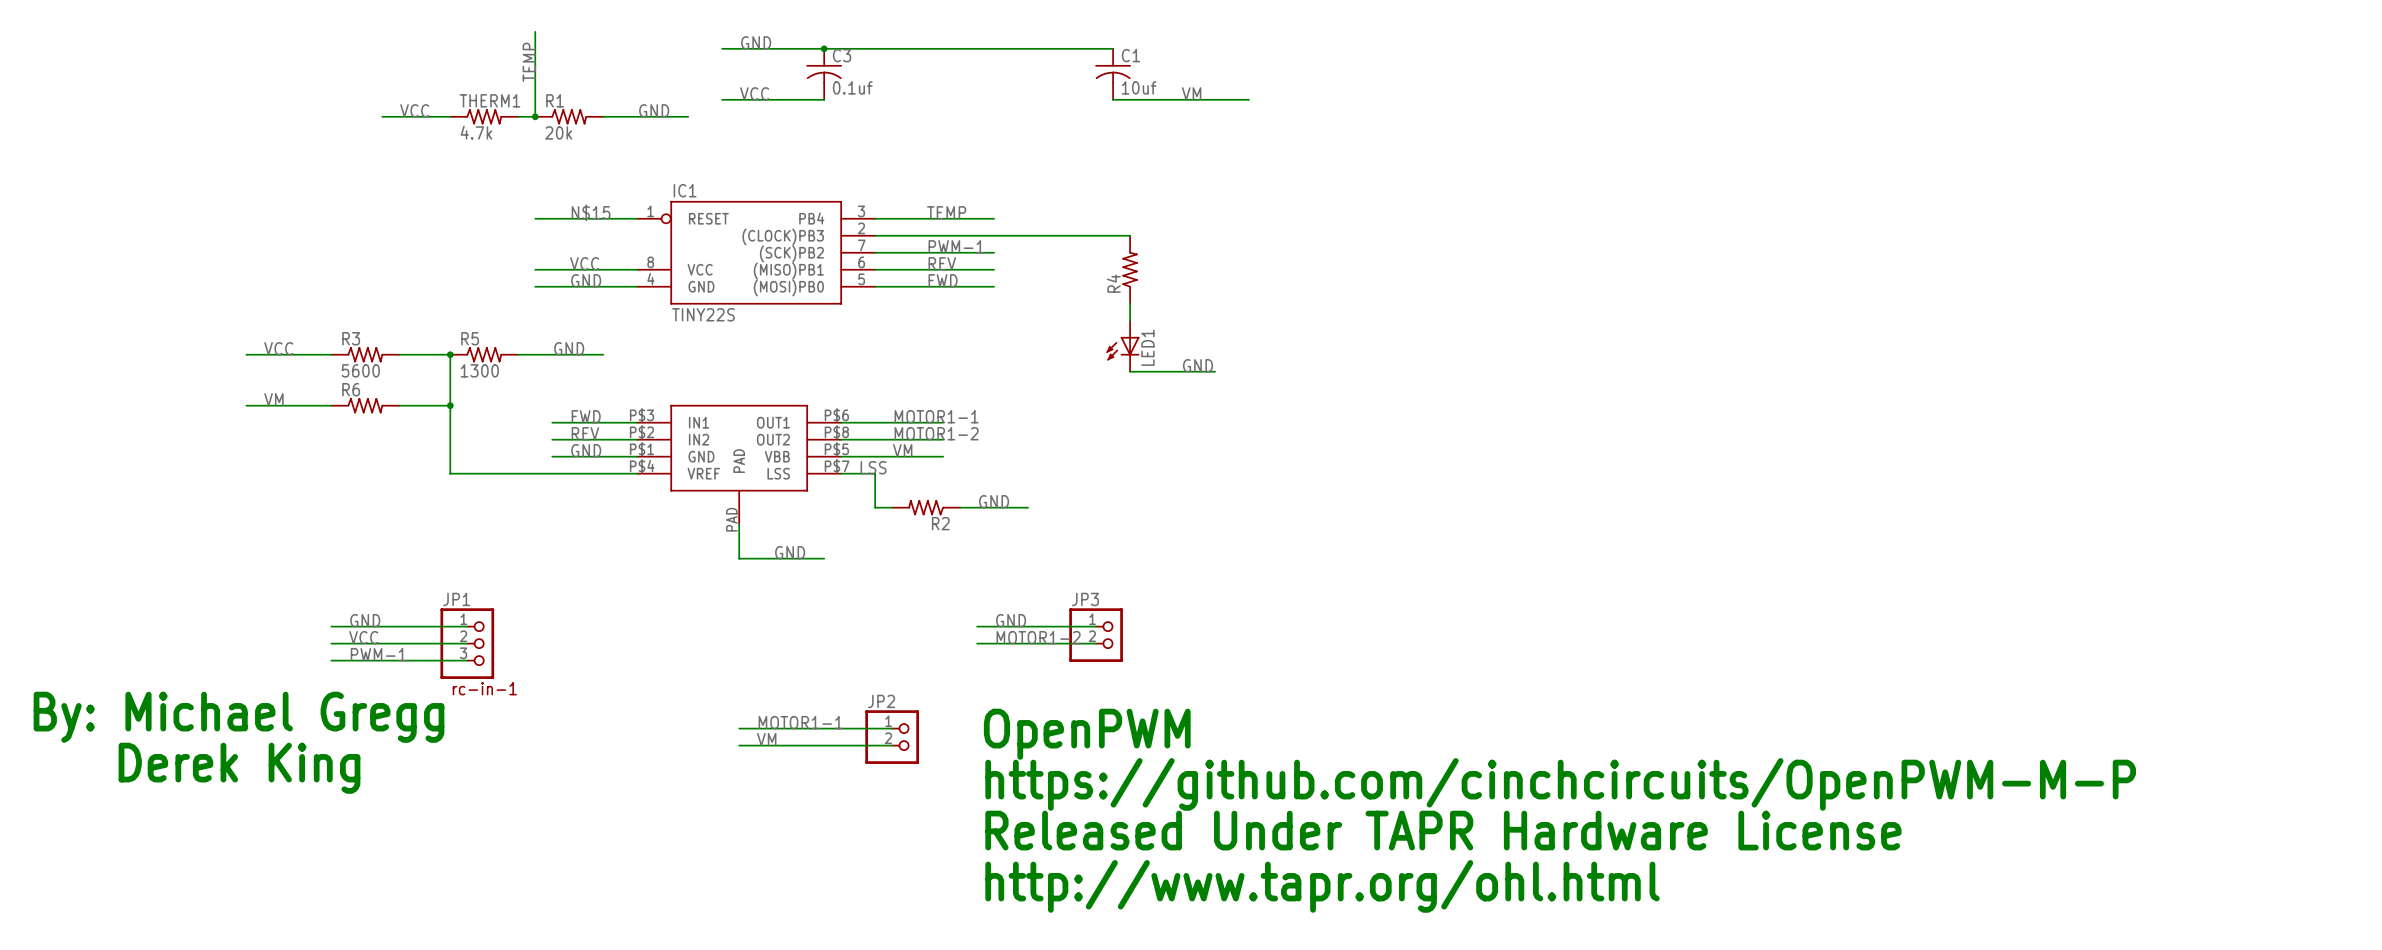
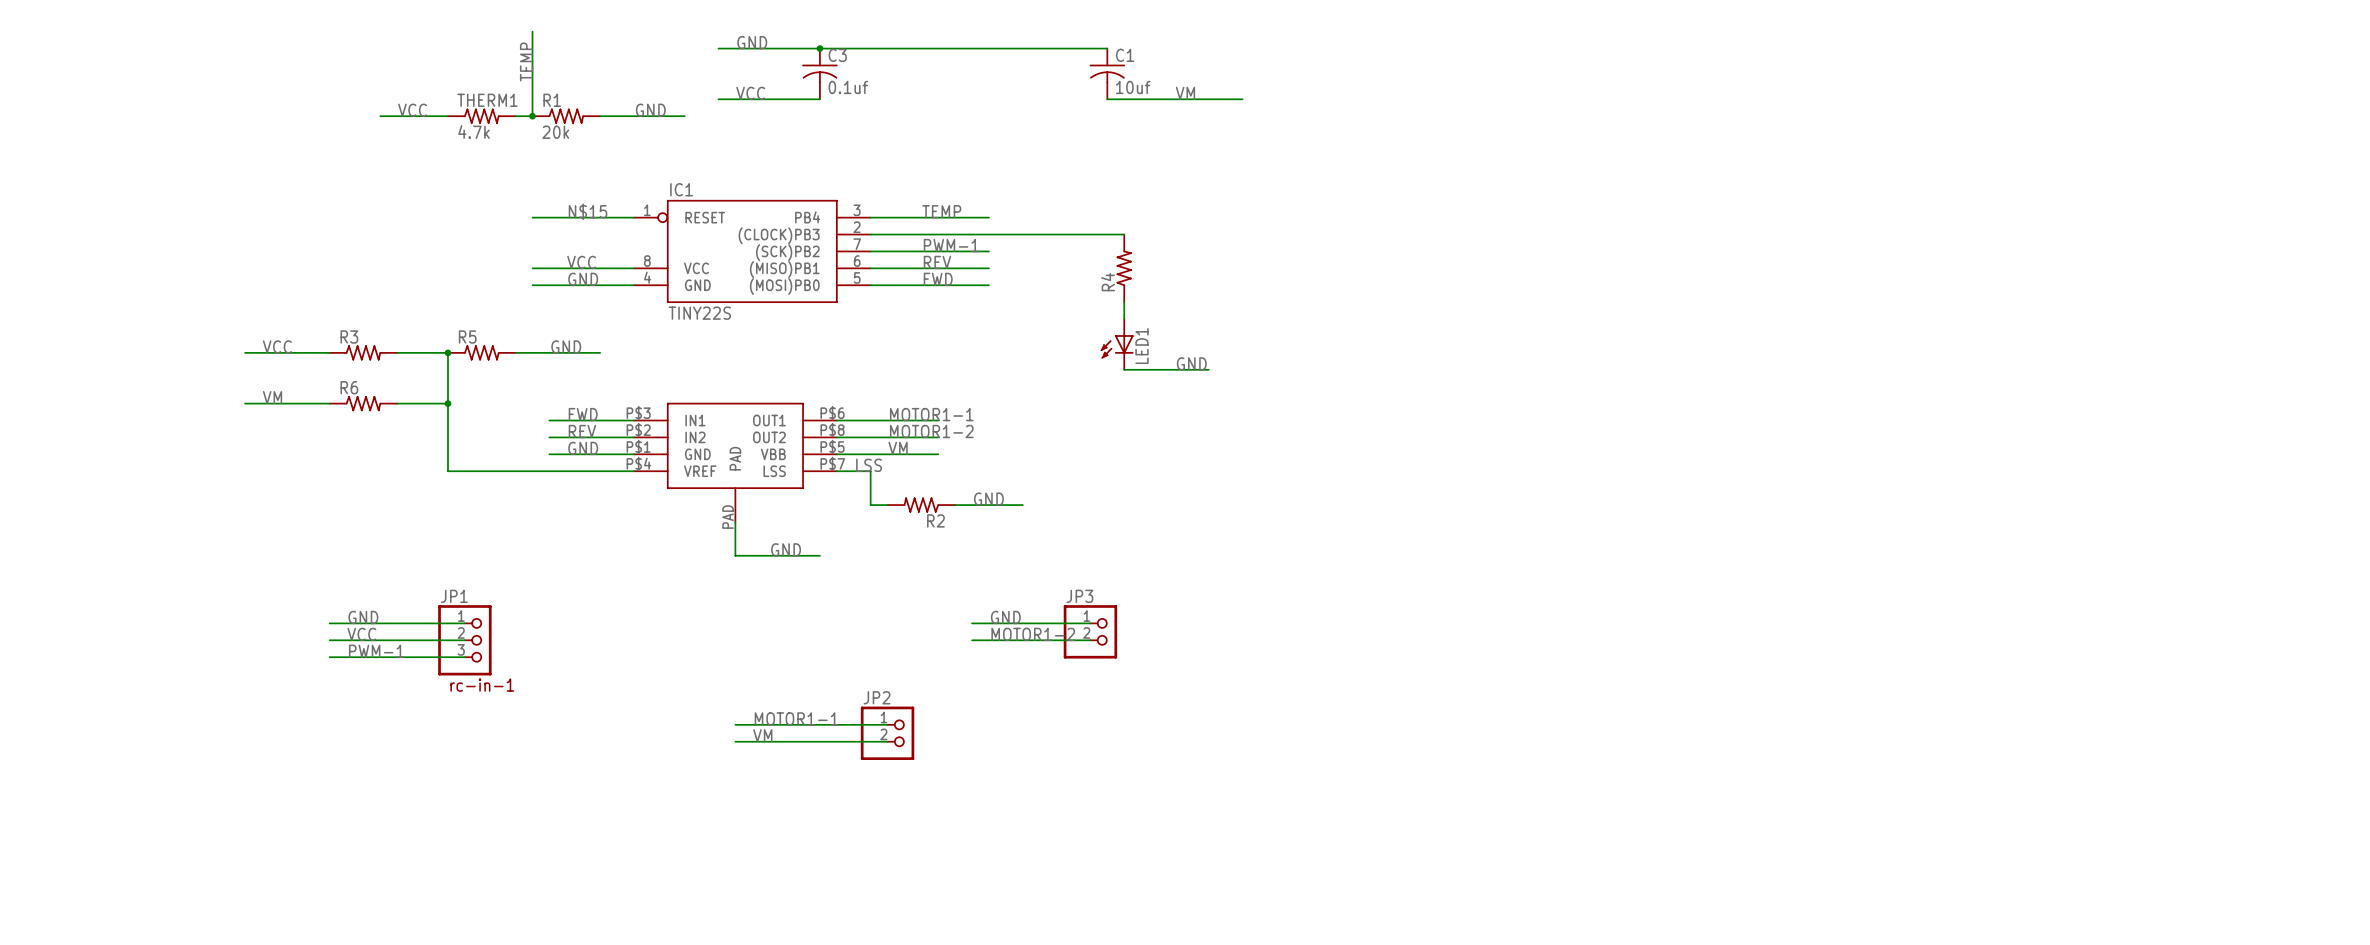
R3 value: 5600 (360, 370) -> none
R5 value: 1300 (479, 370) -> none
text: By: Michael Gregg (239, 717) -> none
text: OpenPWM (1087, 734) -> none
text: Derek King (239, 768) -> none
text: https://github.com/cinchcircuits/OpenPWM-M-P (1560, 784) -> none
text: Released Under TAPR Hardware License (1443, 830) -> none
text: http://www.tapr.org/ohl.html (1322, 886) -> none

